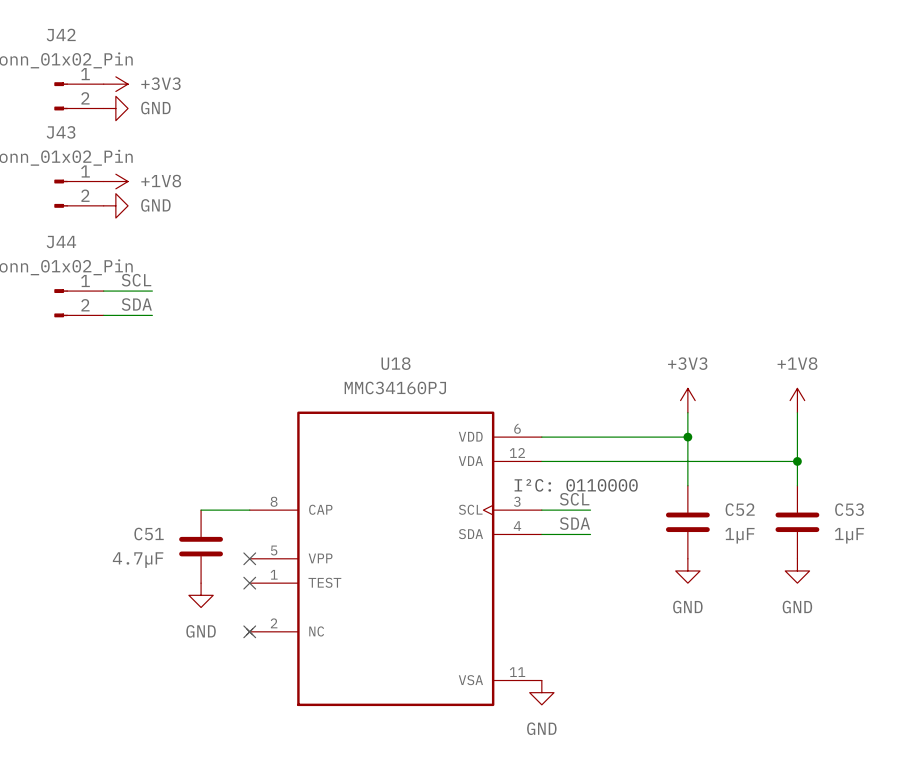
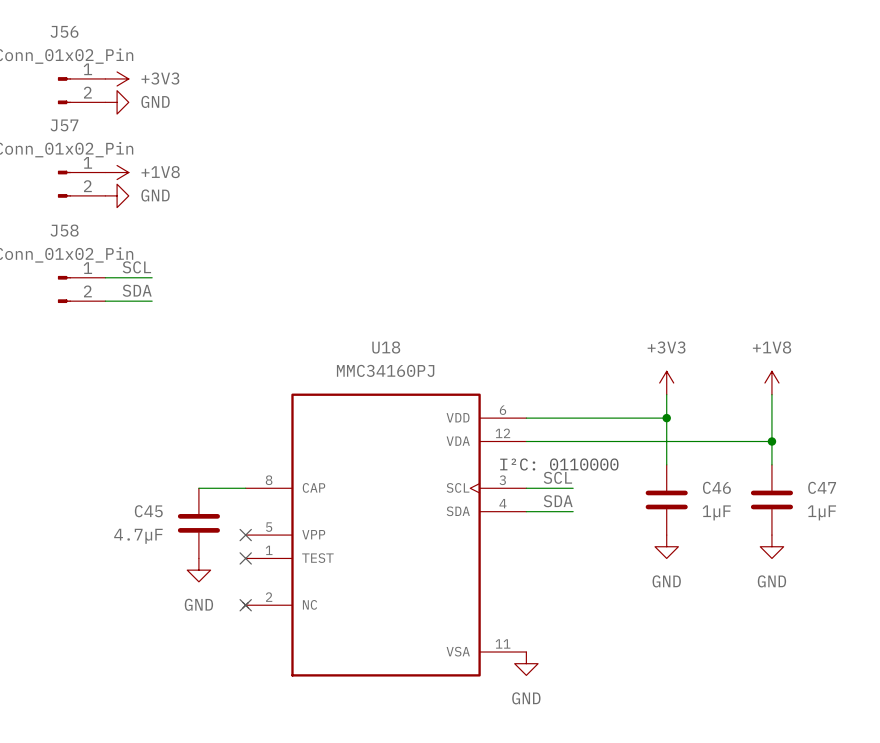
J42 name: J42 (61, 35) -> J56 (64, 31)
J43 name: J43 (61, 132) -> J57 (64, 125)
J44 name: J44 (61, 242) -> J58 (64, 230)
C52 name: C52 (740, 509) -> C46 (716, 487)
C53 name: C53 (849, 509) -> C47 (822, 487)
C51 name: C51 (149, 534) -> C45 (148, 511)

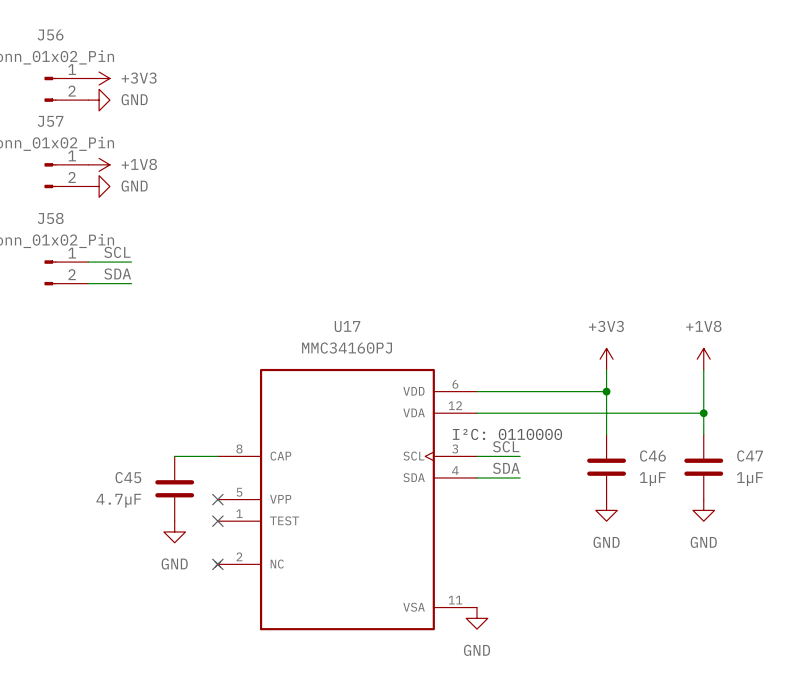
U18 name: U18 (386, 347) -> U17 (347, 326)

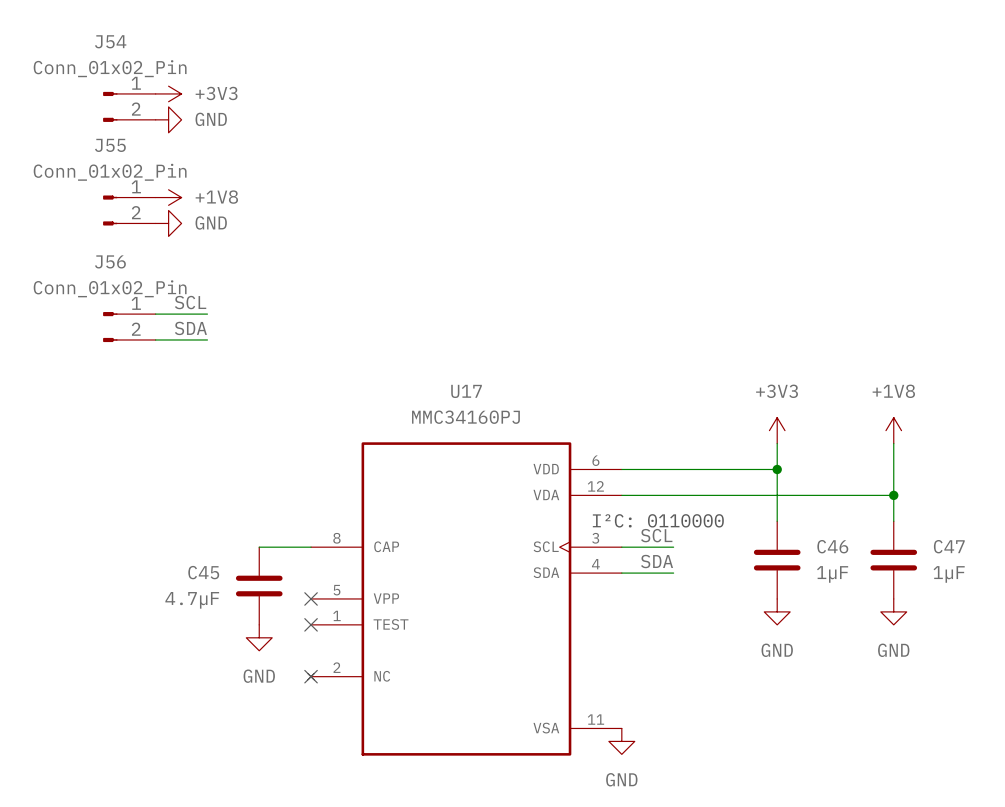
J56 name: J56 (50, 35) -> J54 (110, 41)
J57 name: J57 (50, 121) -> J55 (110, 145)
J58 name: J58 (50, 218) -> J56 (110, 261)

